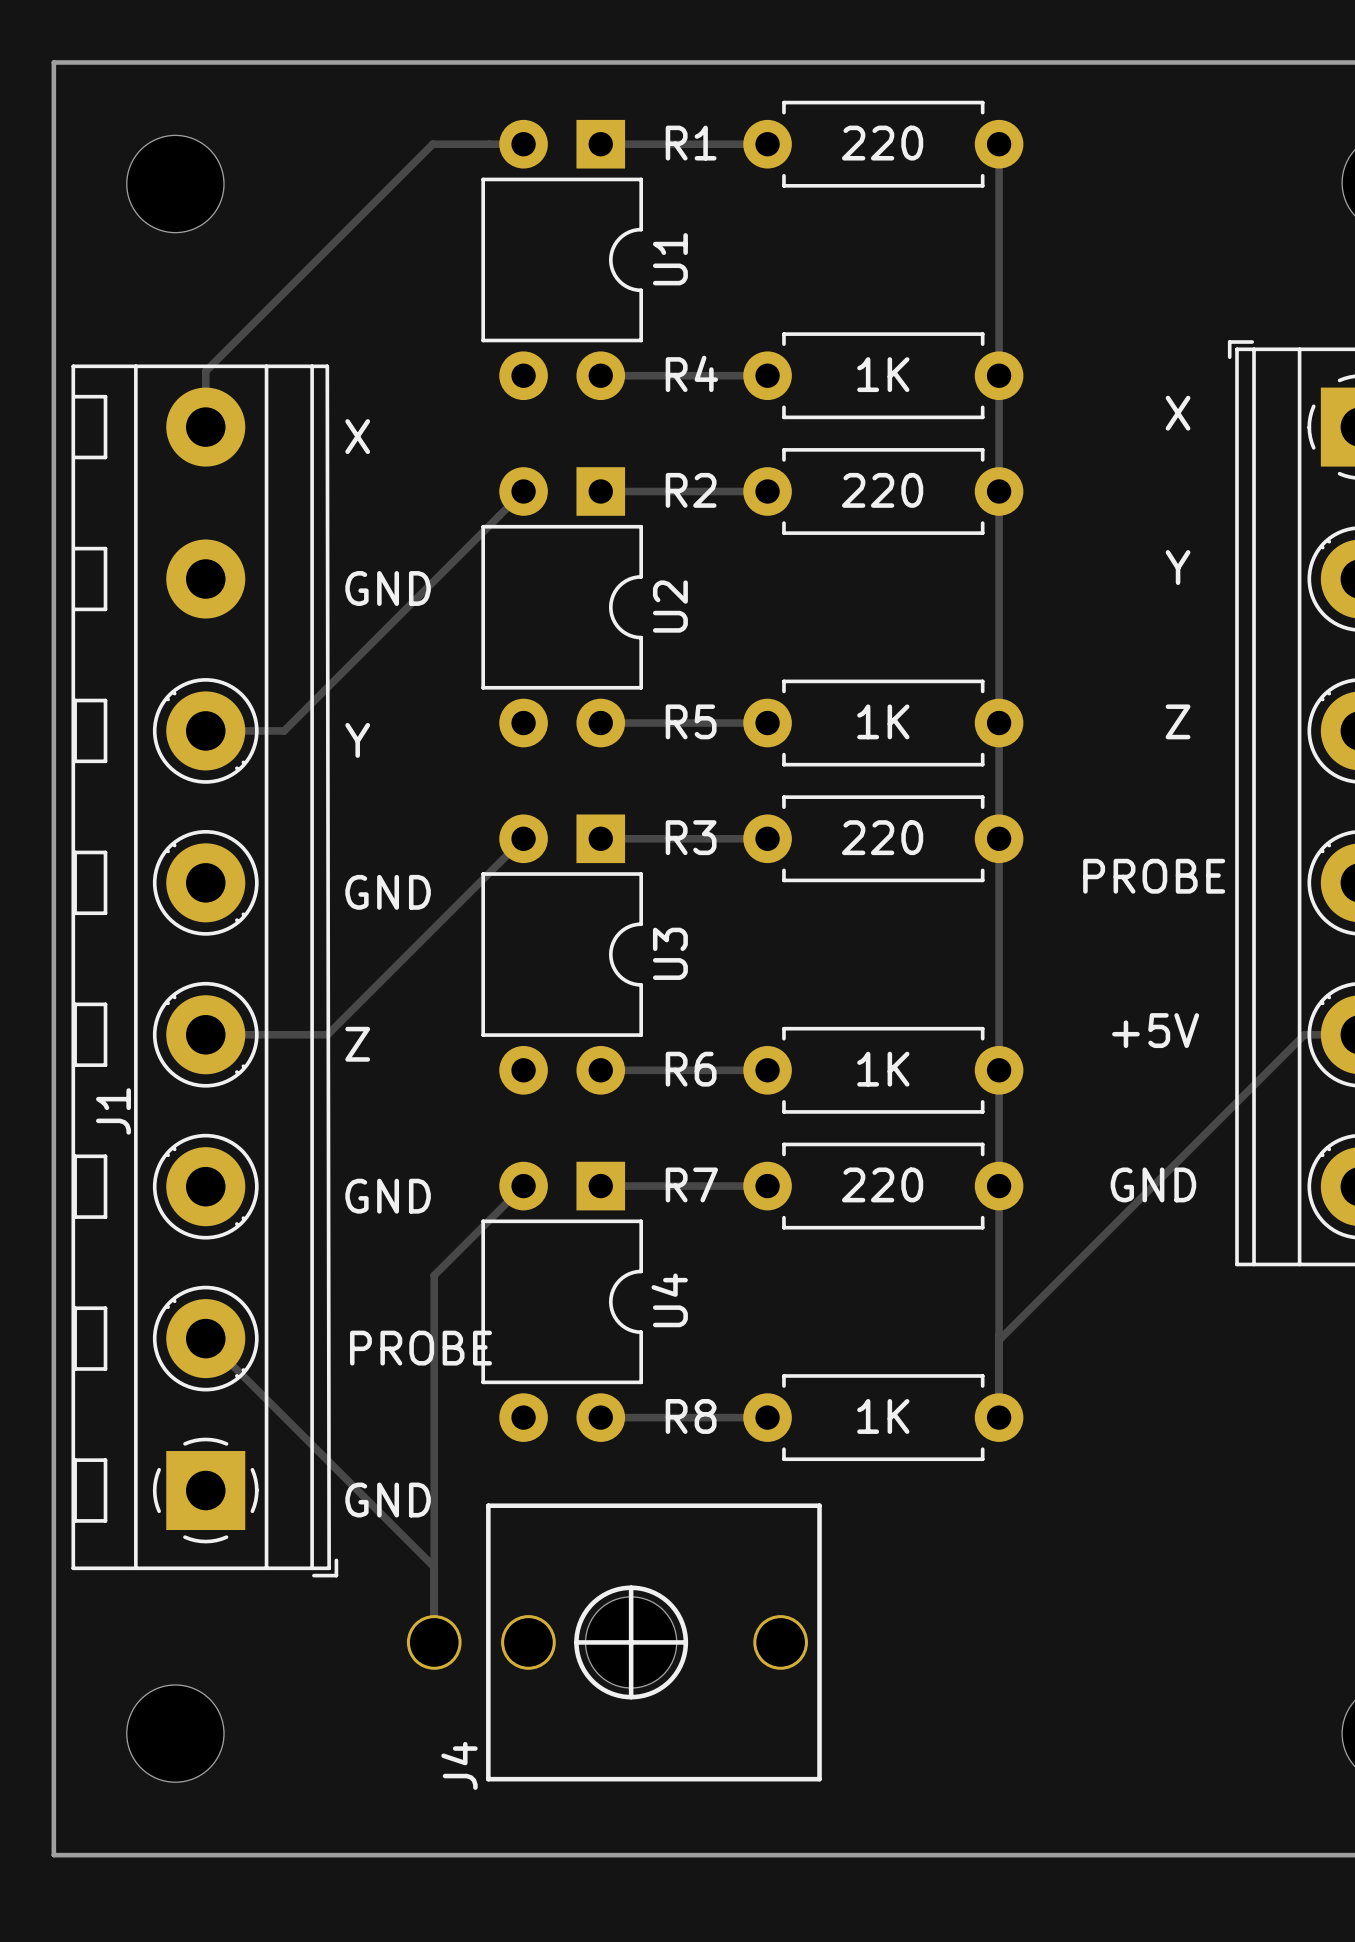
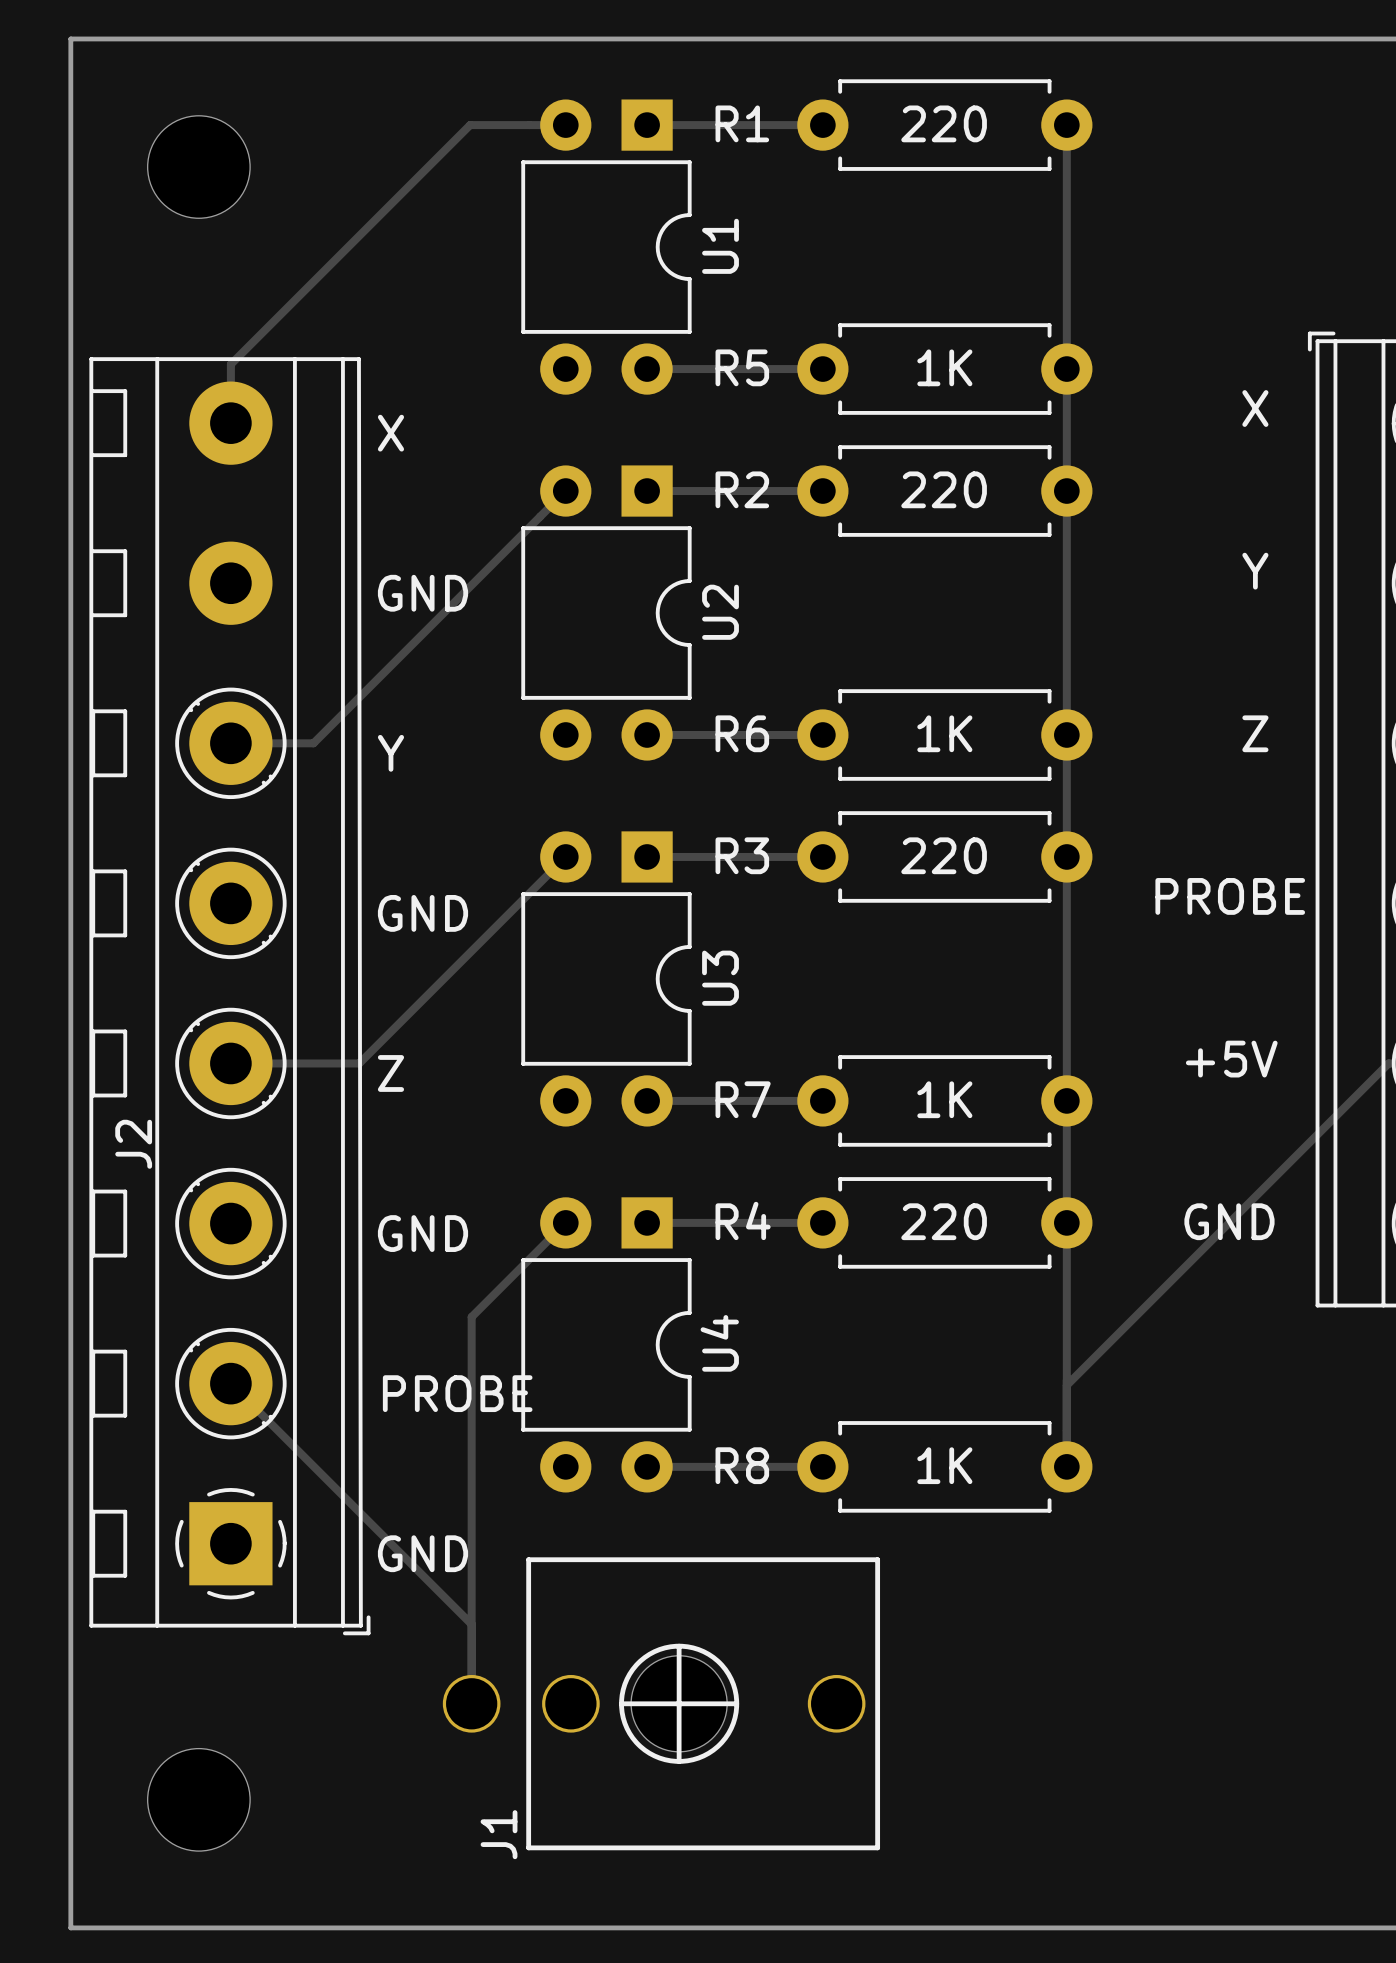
R4 name: R4 (691, 373) -> R5 (742, 367)
R5 name: R5 (691, 721) -> R6 (742, 733)
R6 name: R6 (691, 1069) -> R7 (743, 1099)
J1 name: J1 (113, 1111) -> J2 (133, 1144)
R7 name: R7 (691, 1184) -> R4 (743, 1220)
J4 name: J4 (459, 1765) -> J1 (499, 1834)

